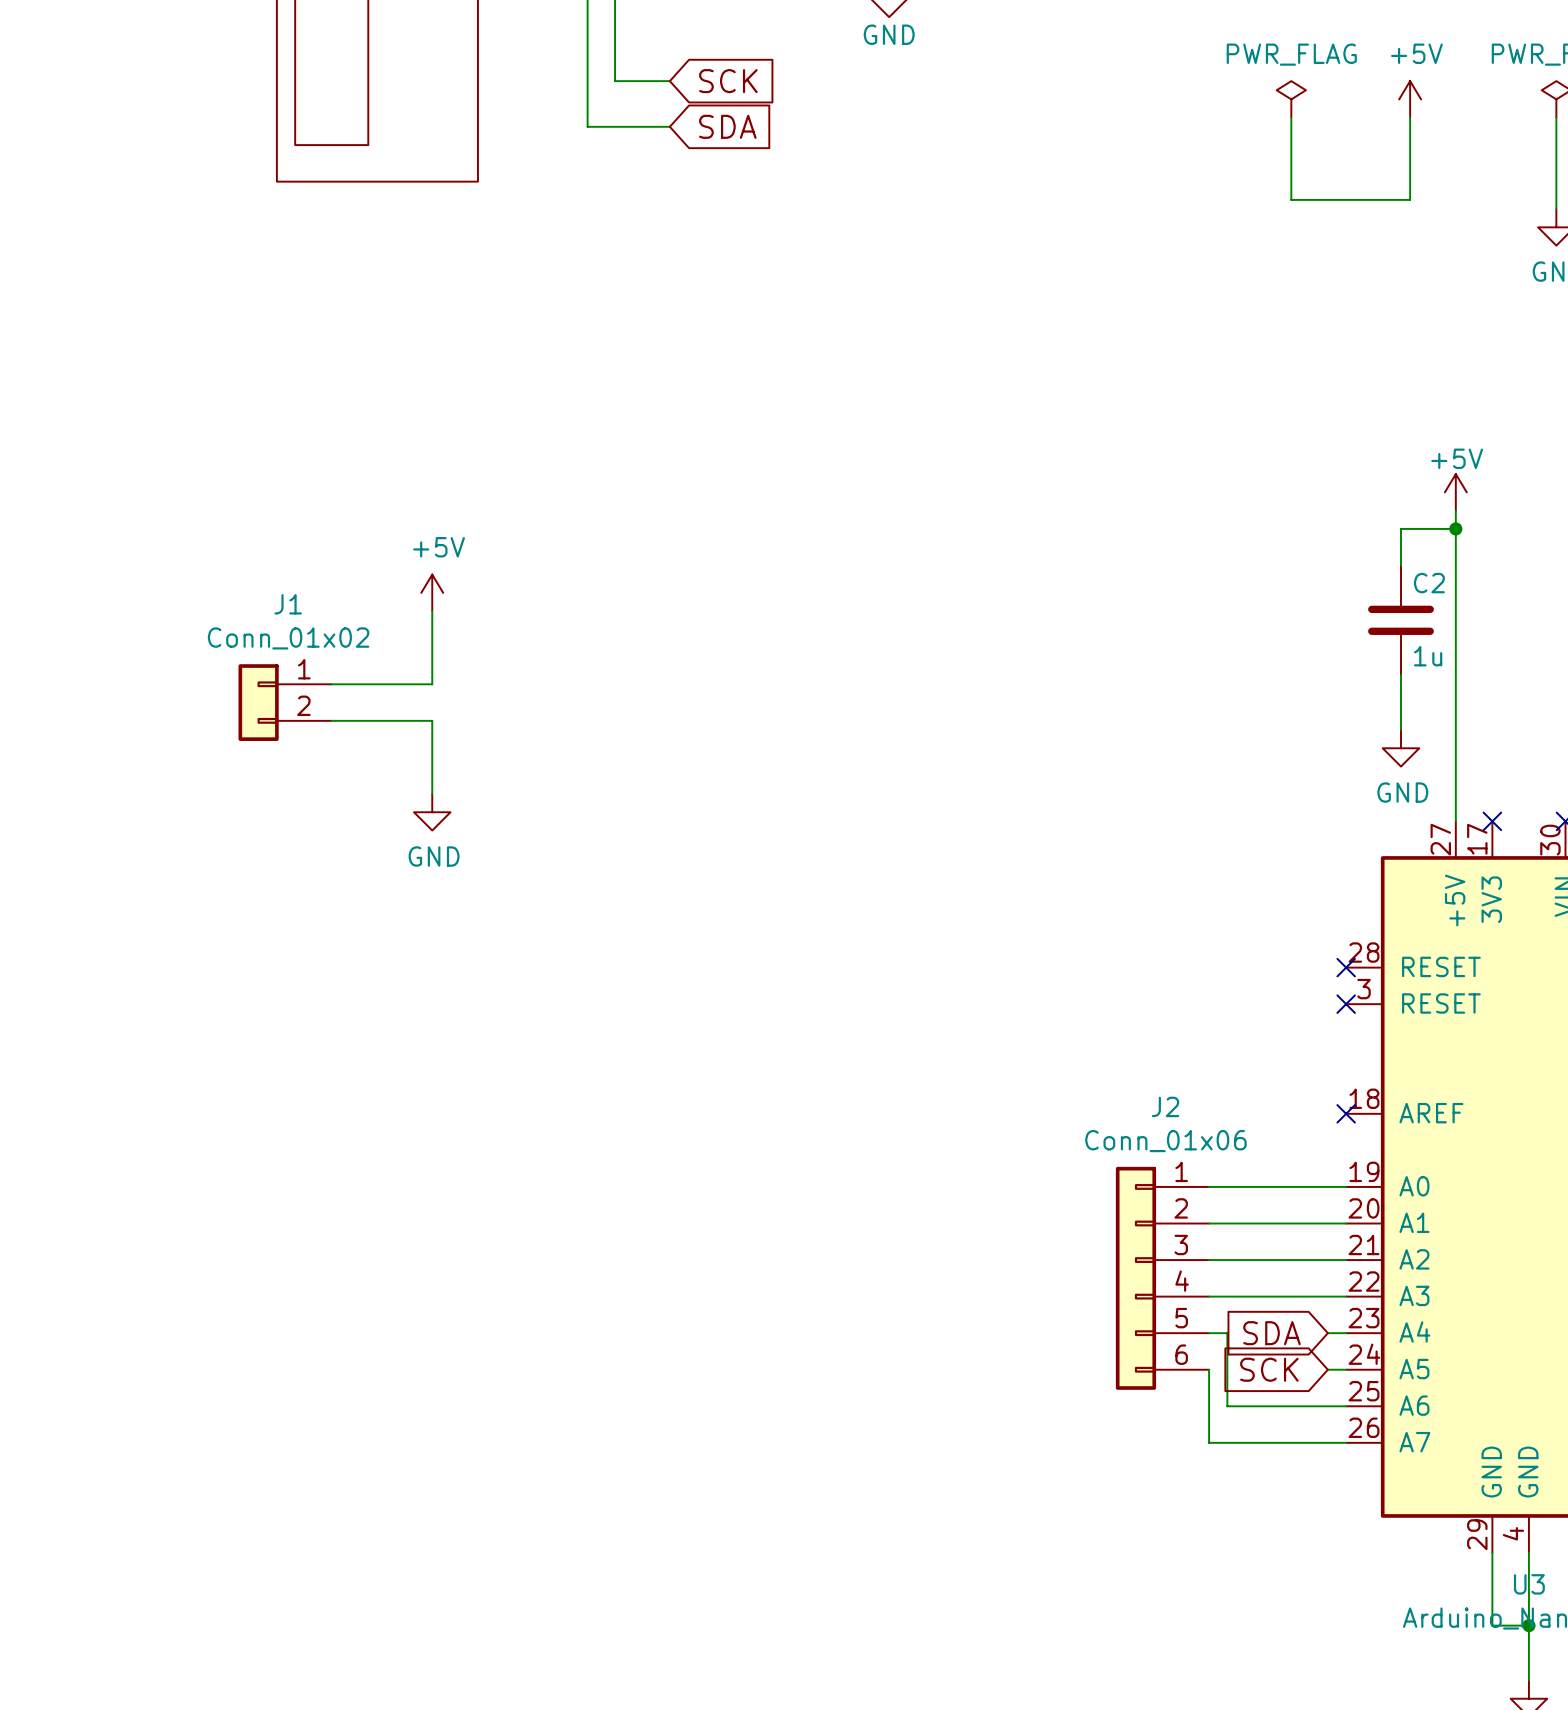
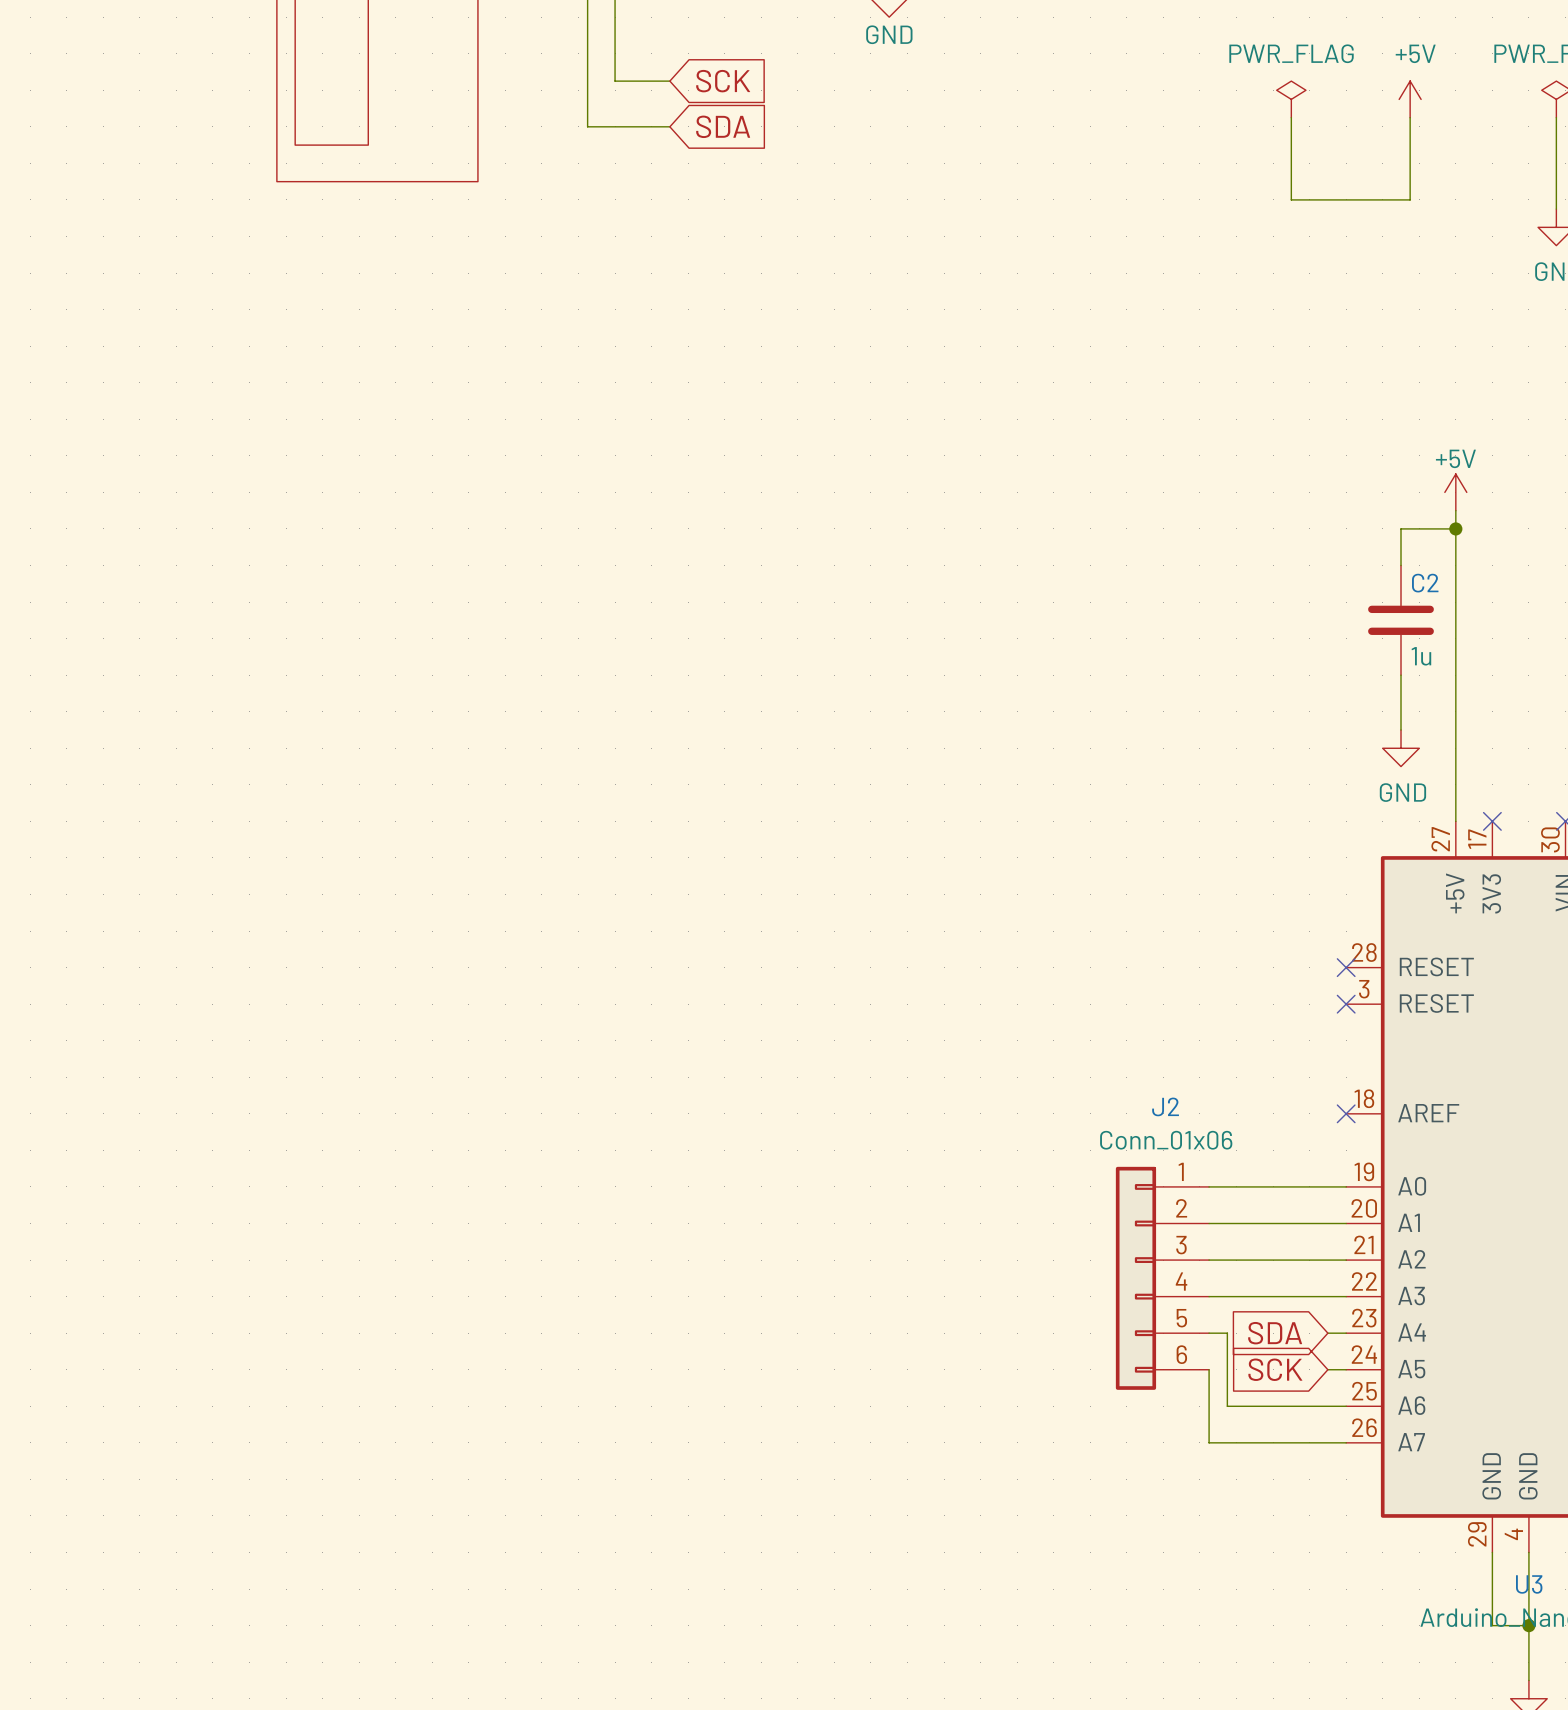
power symbol: +5V (432, 592) -> none
wire: (432, 611) (432, 684) (331, 684) -> none
J1: Conn_01x02 (285, 702) -> none
wire: (331, 720) (432, 720) (432, 793) -> none
power symbol: GND (432, 812) -> none

